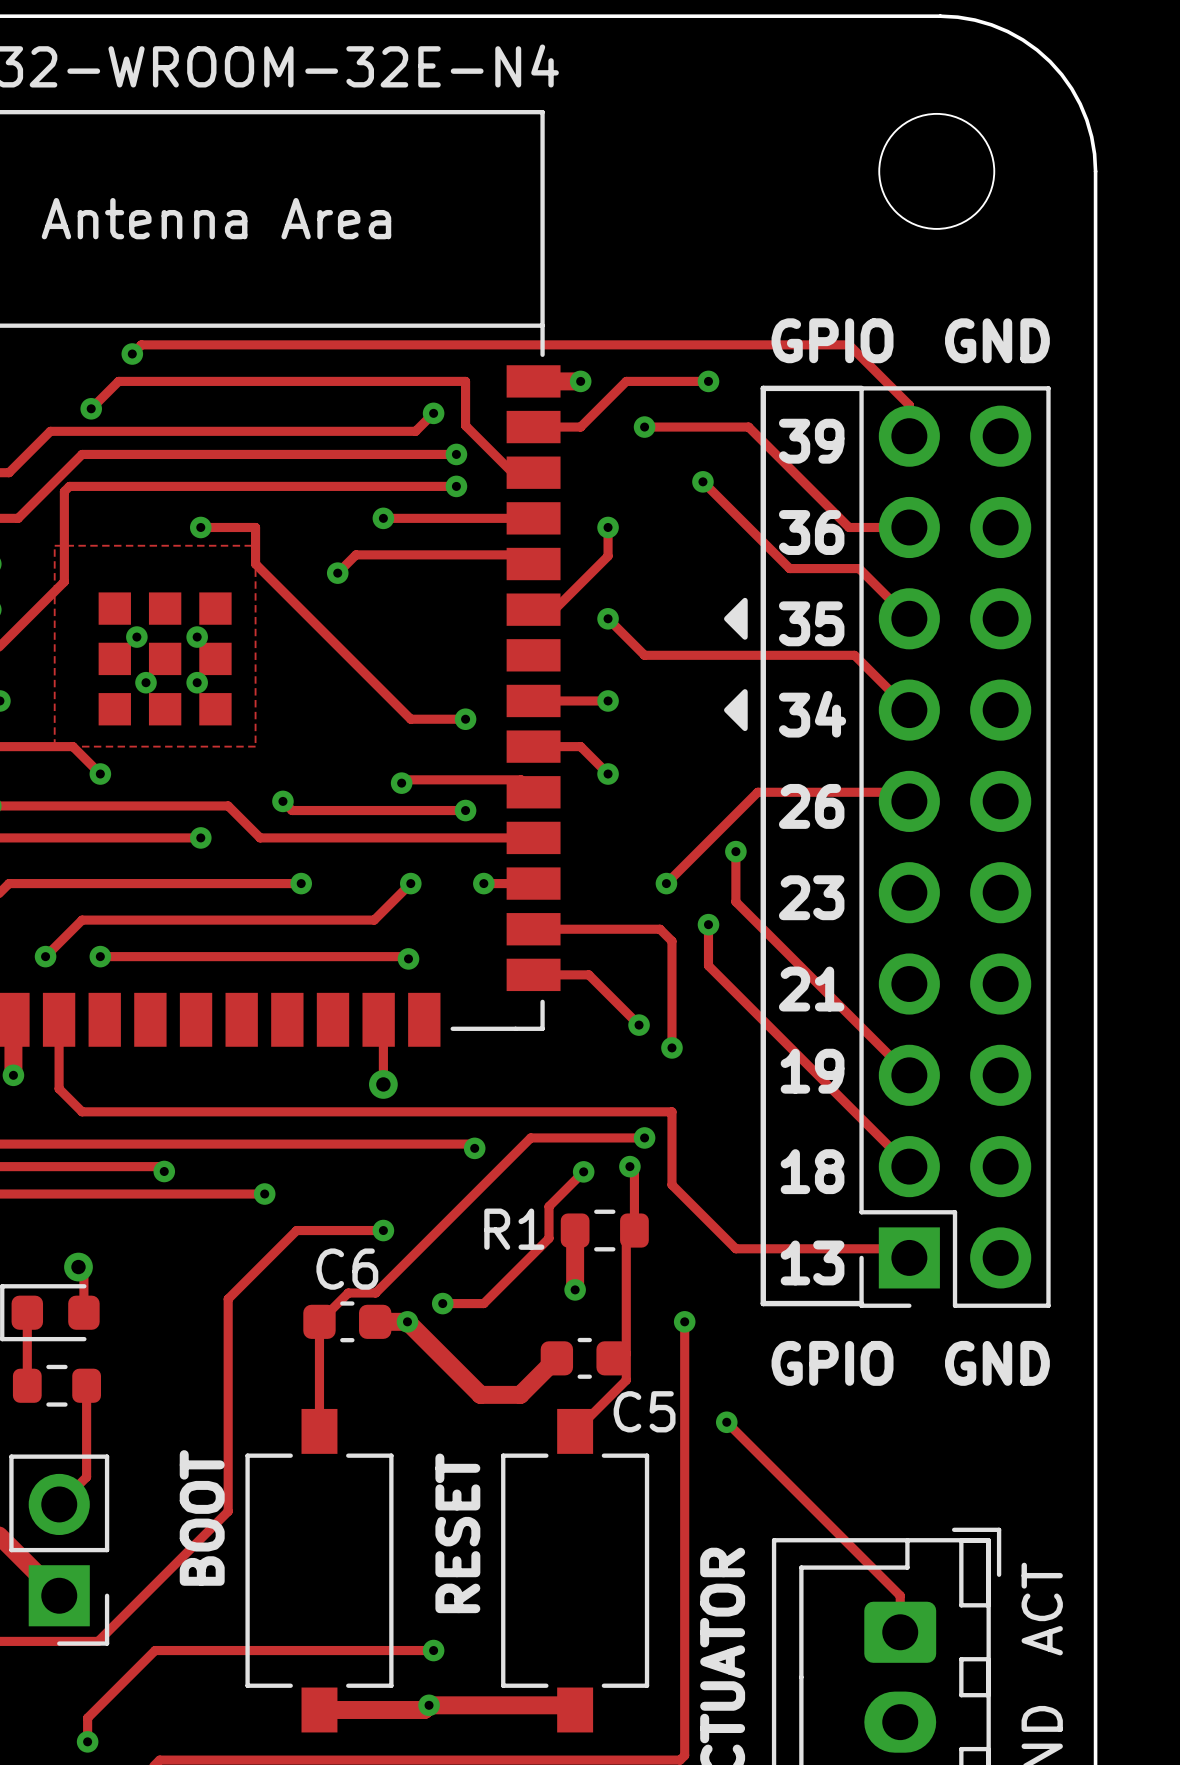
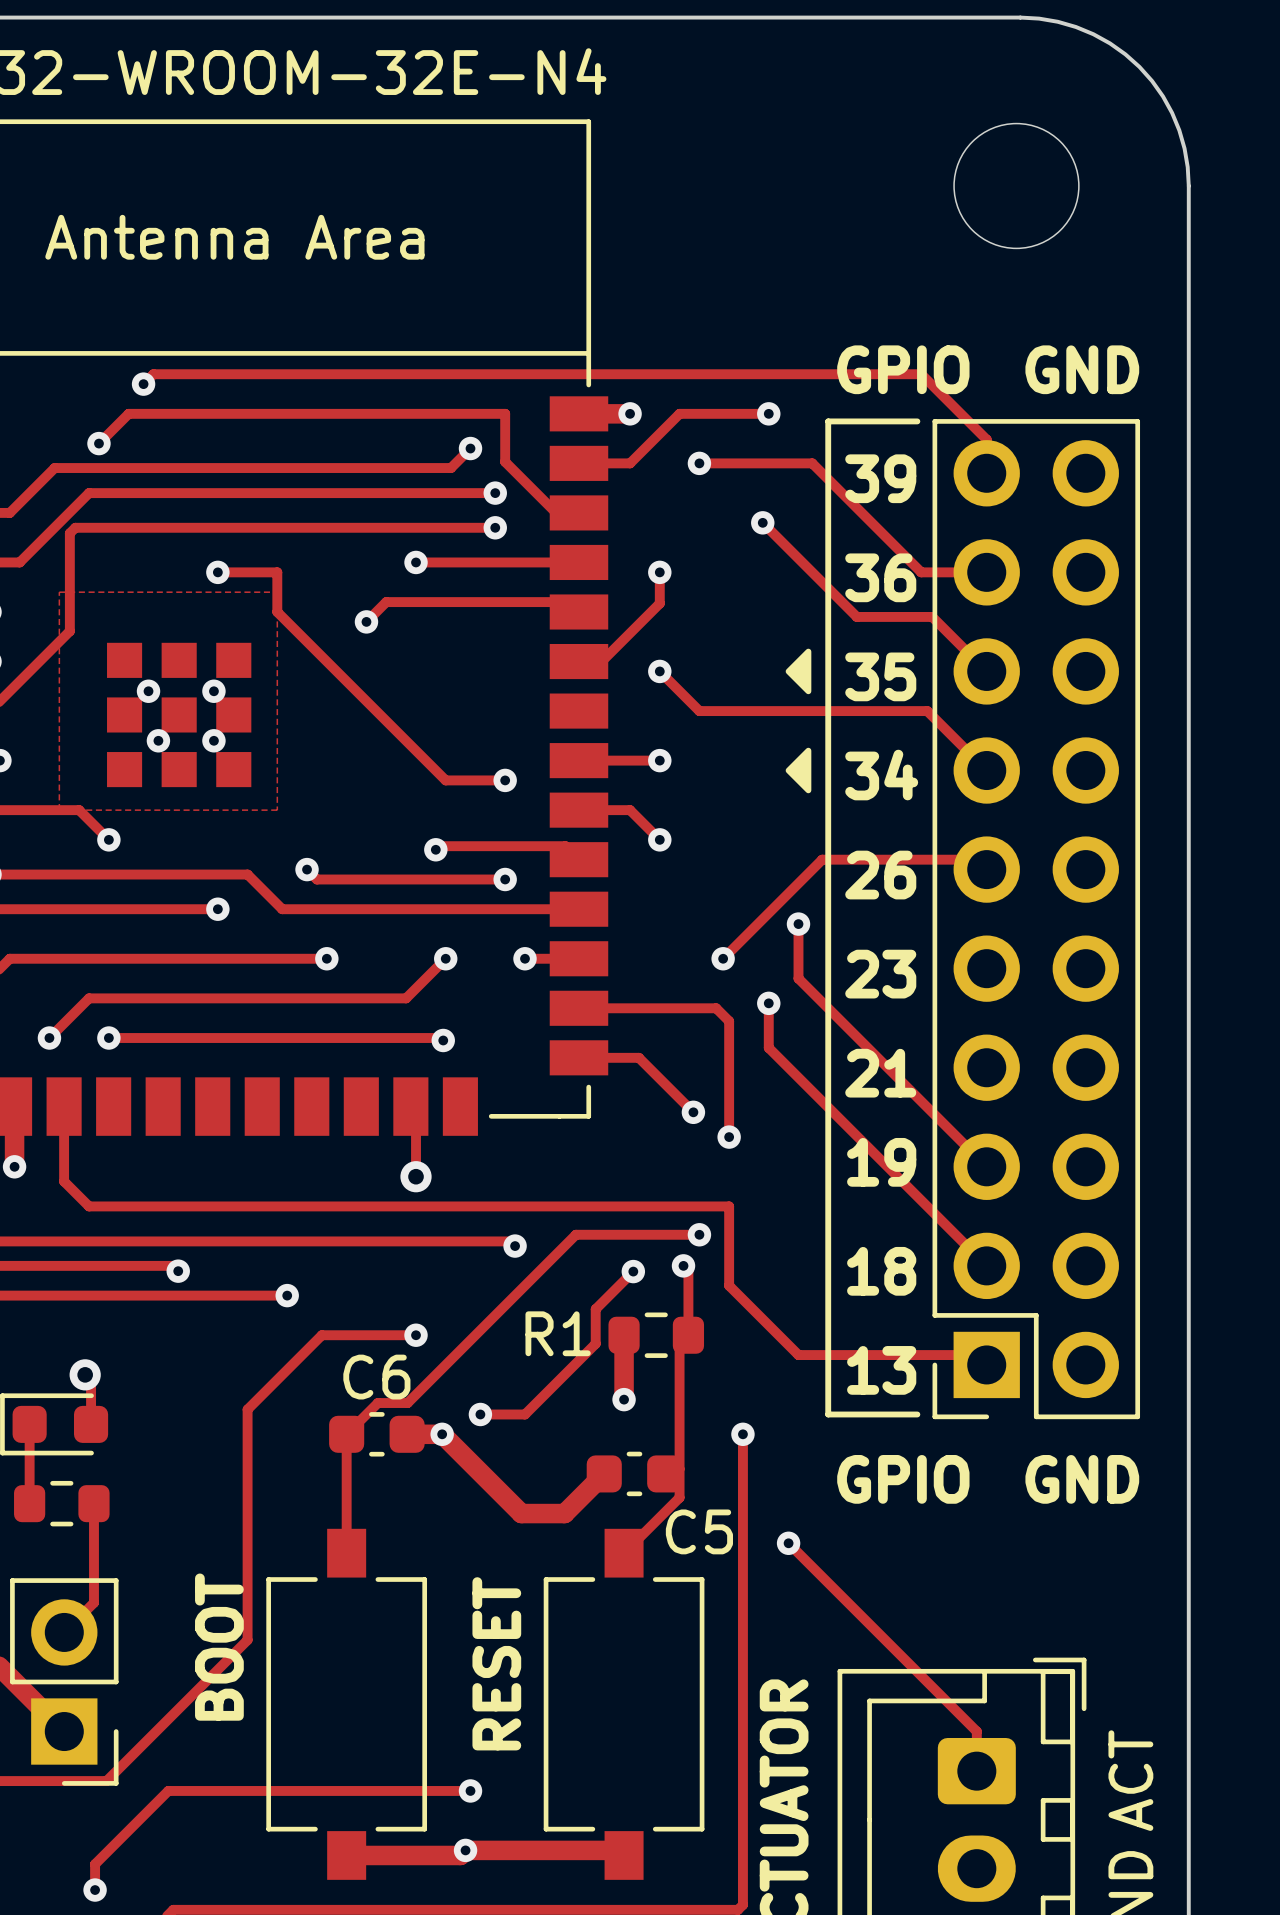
line: (845, 388) (861, 388) -> none
line: (845, 1303) (861, 1303) -> none
text position: ACT (1042, 1609) -> ACT (1130, 1780)

